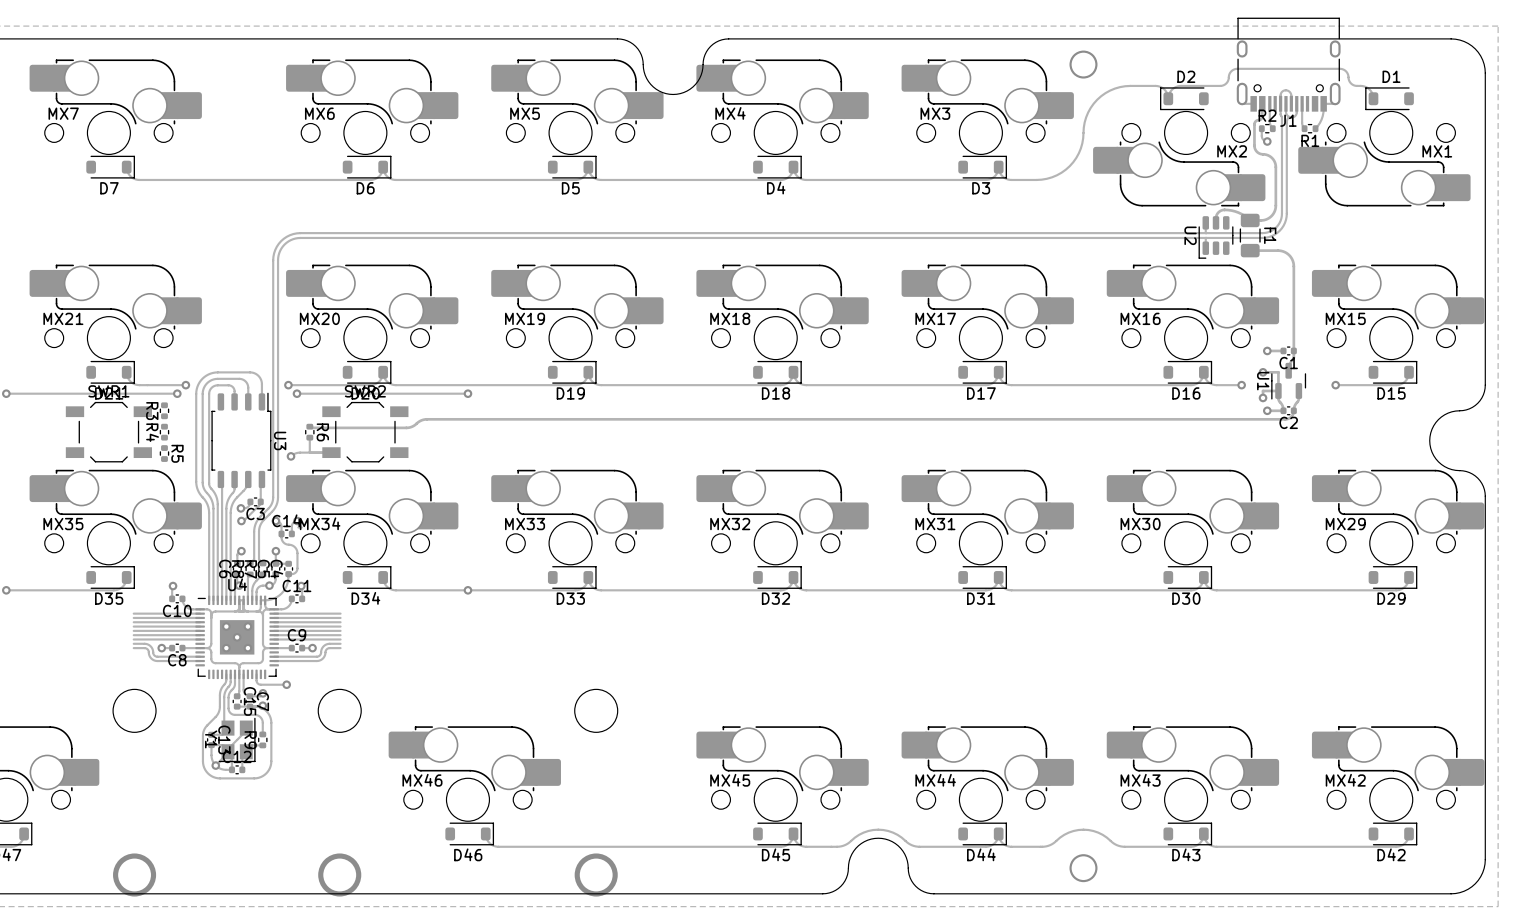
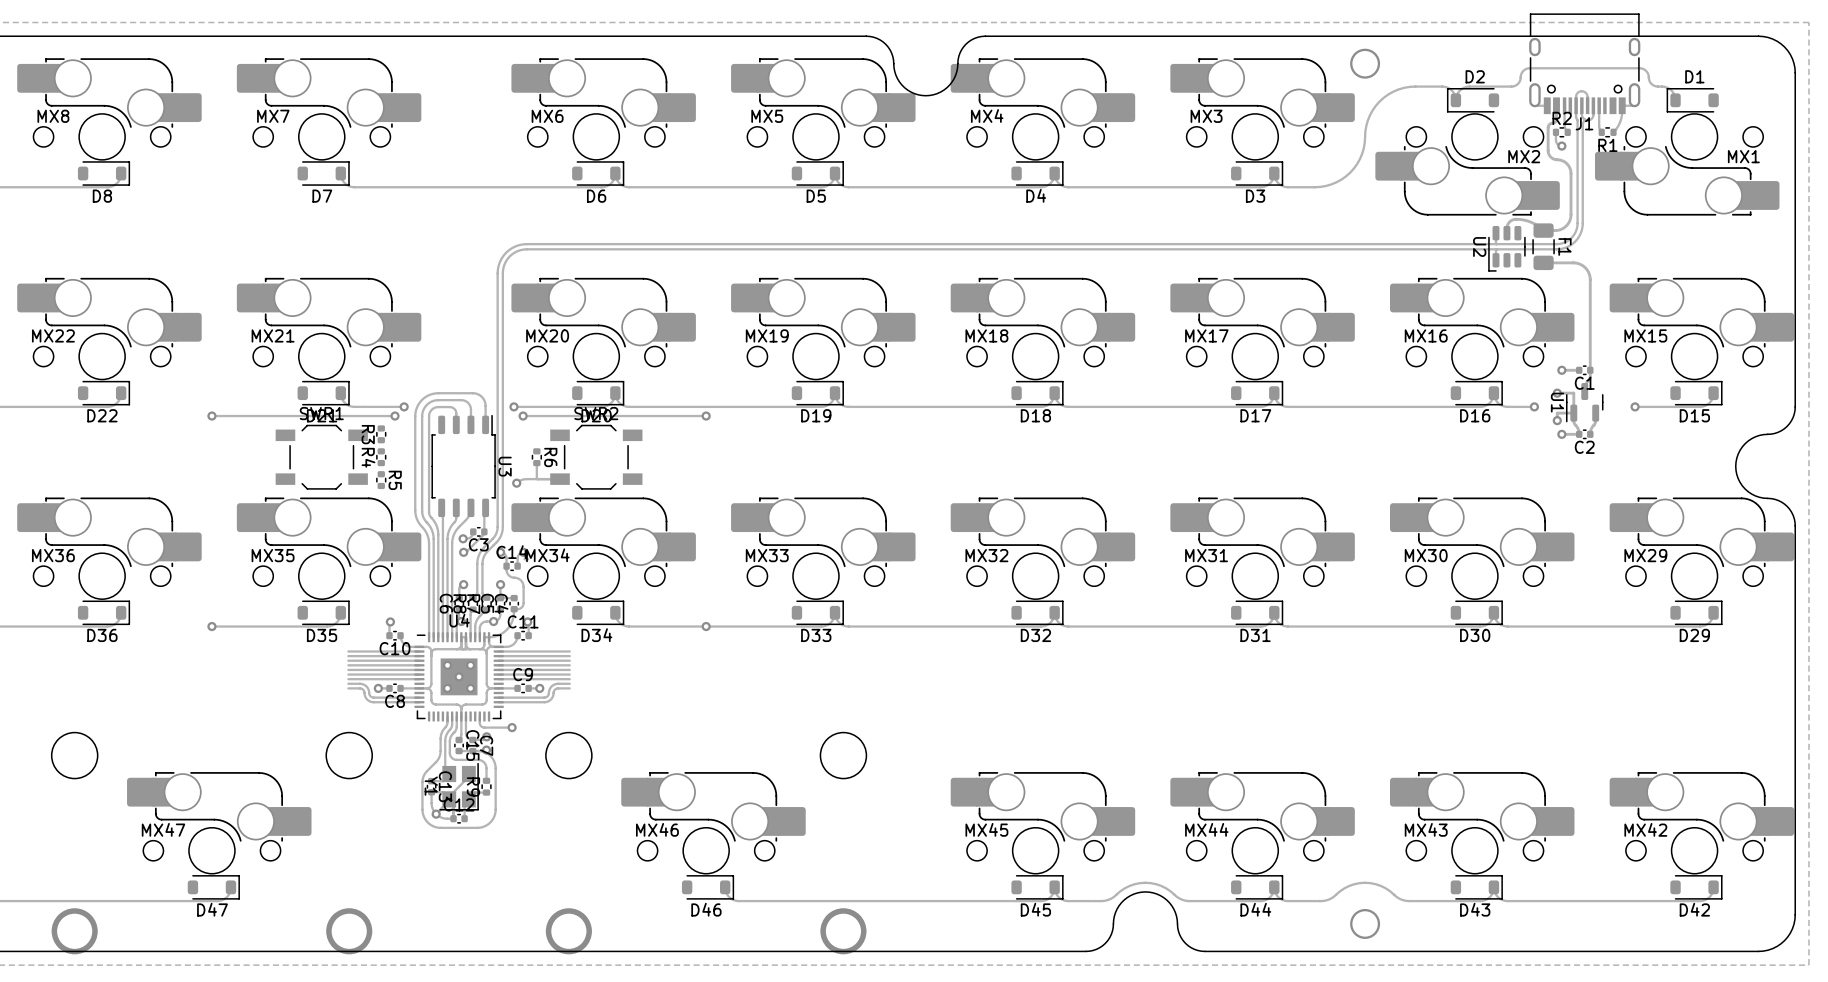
track: (1293, 410) (1291, 416) (1285, 419) (426, 419) (407, 427) (309, 426) -> none

